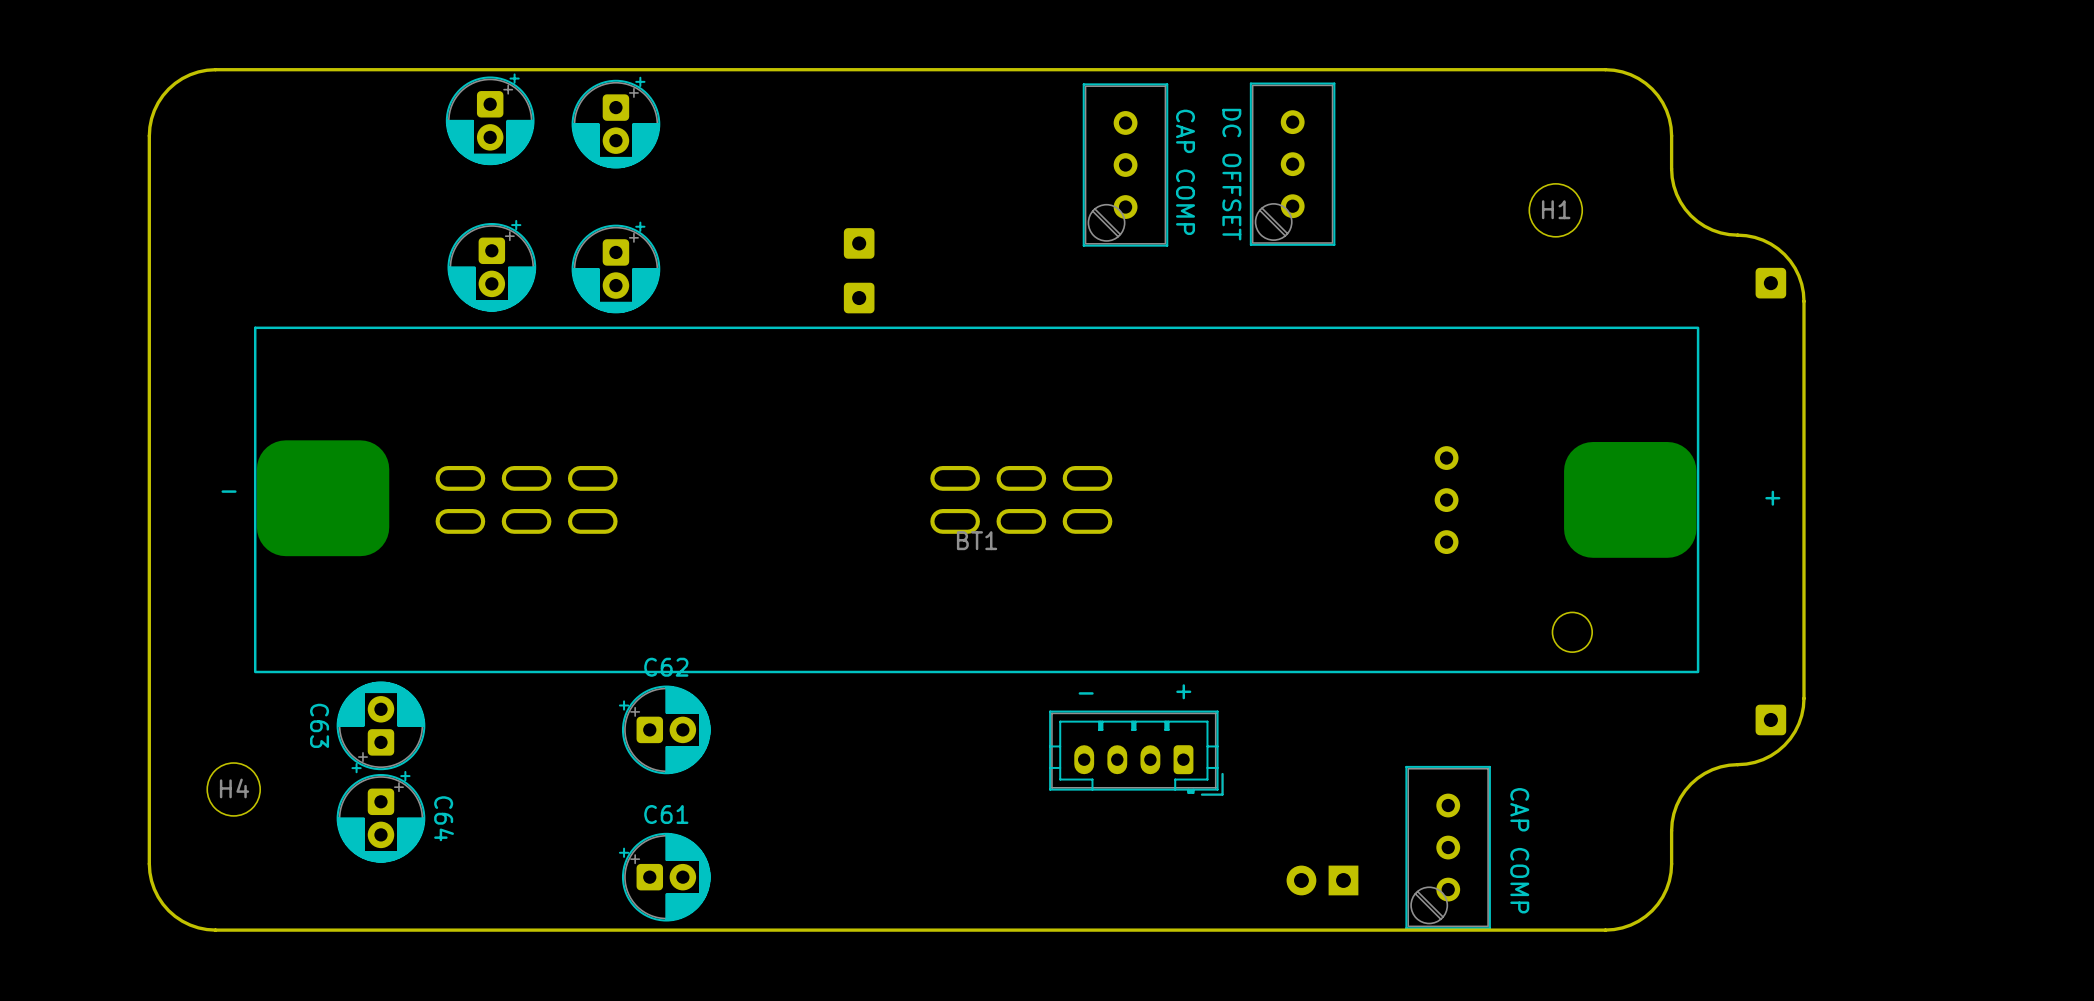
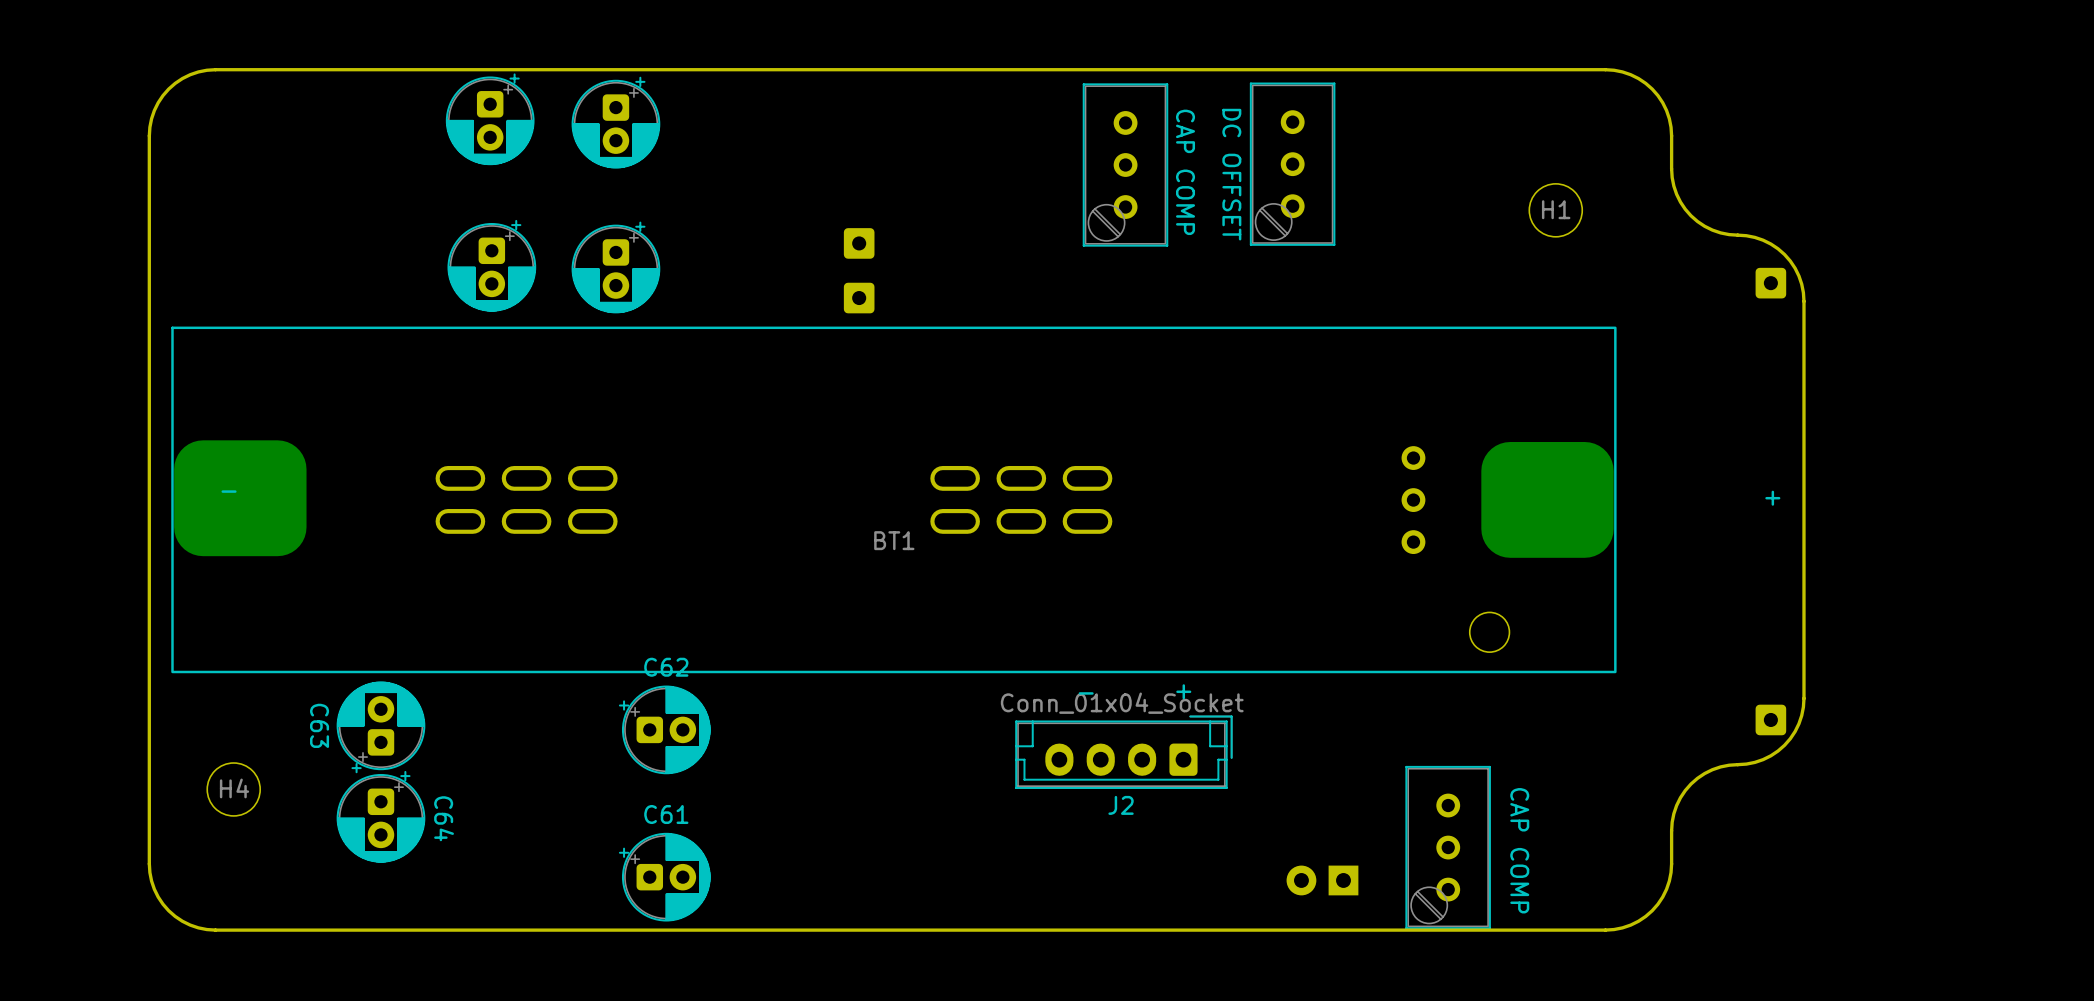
BT1 position: (976, 499) -> (893, 499)
part position: (1446, 500) -> (1413, 500)
J2: none -> Conn_01x04_Socket (1123, 752)
part: (1136, 753) -> none

